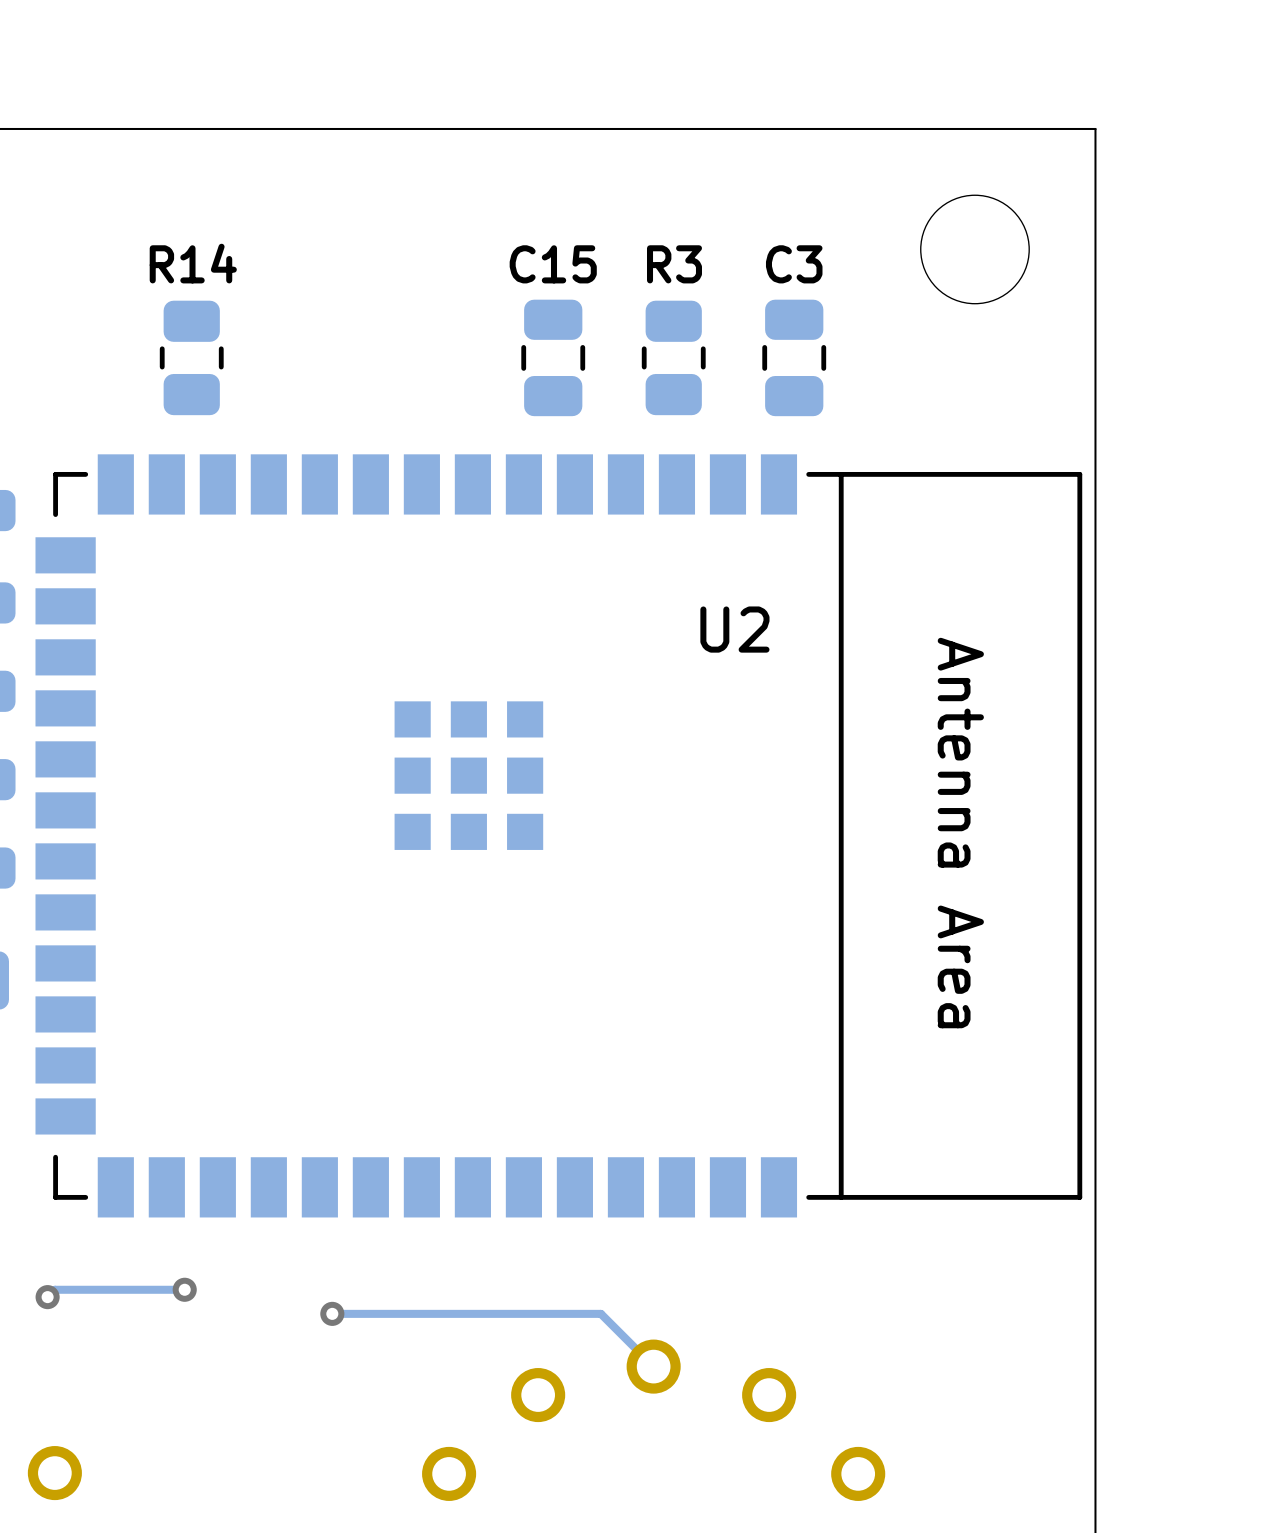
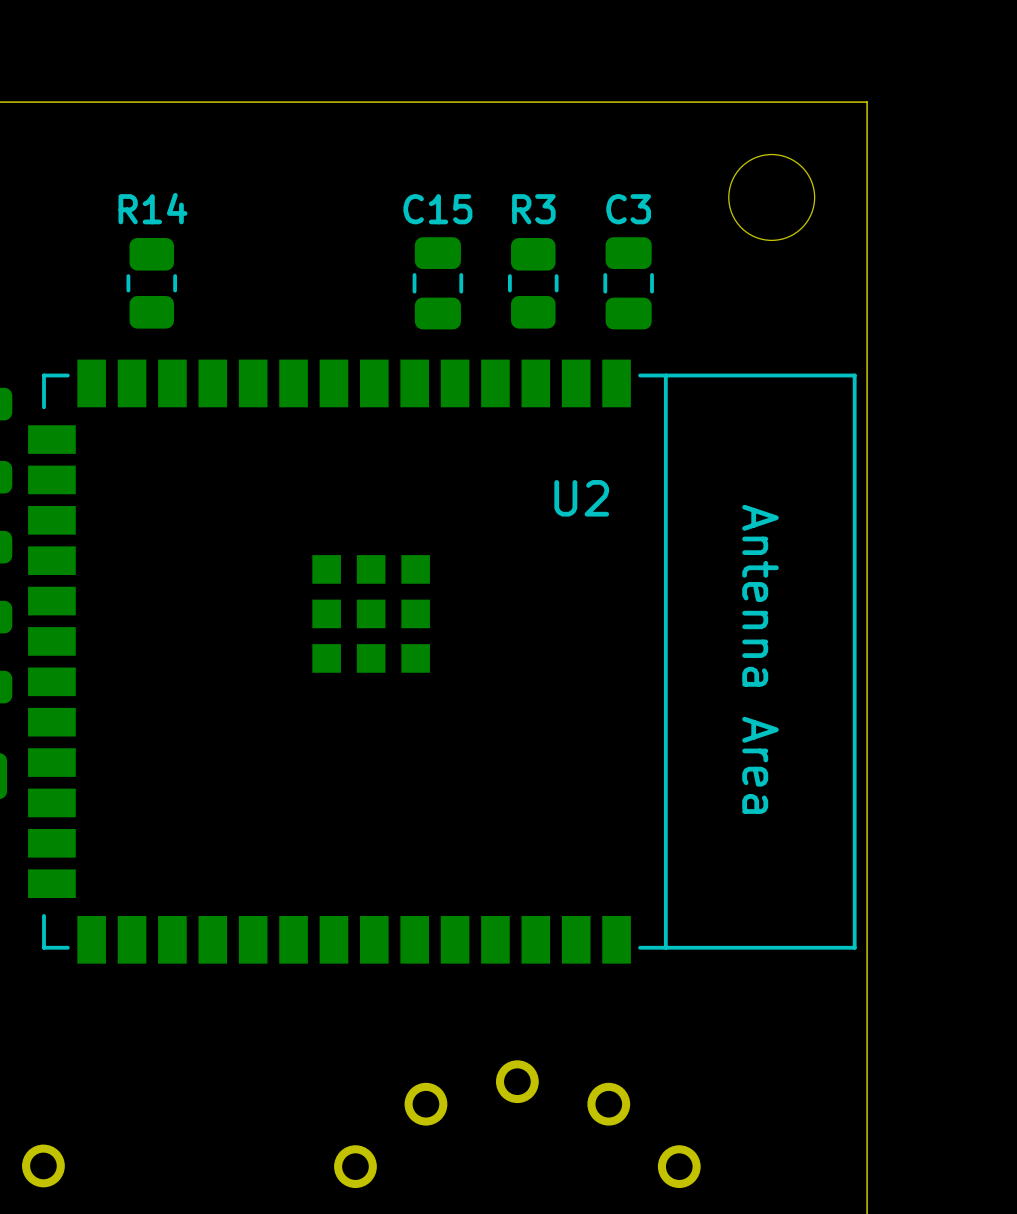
track: (184, 1289) (54, 1289) (47, 1297) -> none
via: (184, 1289) -> none
via: (47, 1297) -> none
track: (332, 1313) (600, 1313) (653, 1366) -> none
via: (332, 1313) -> none

